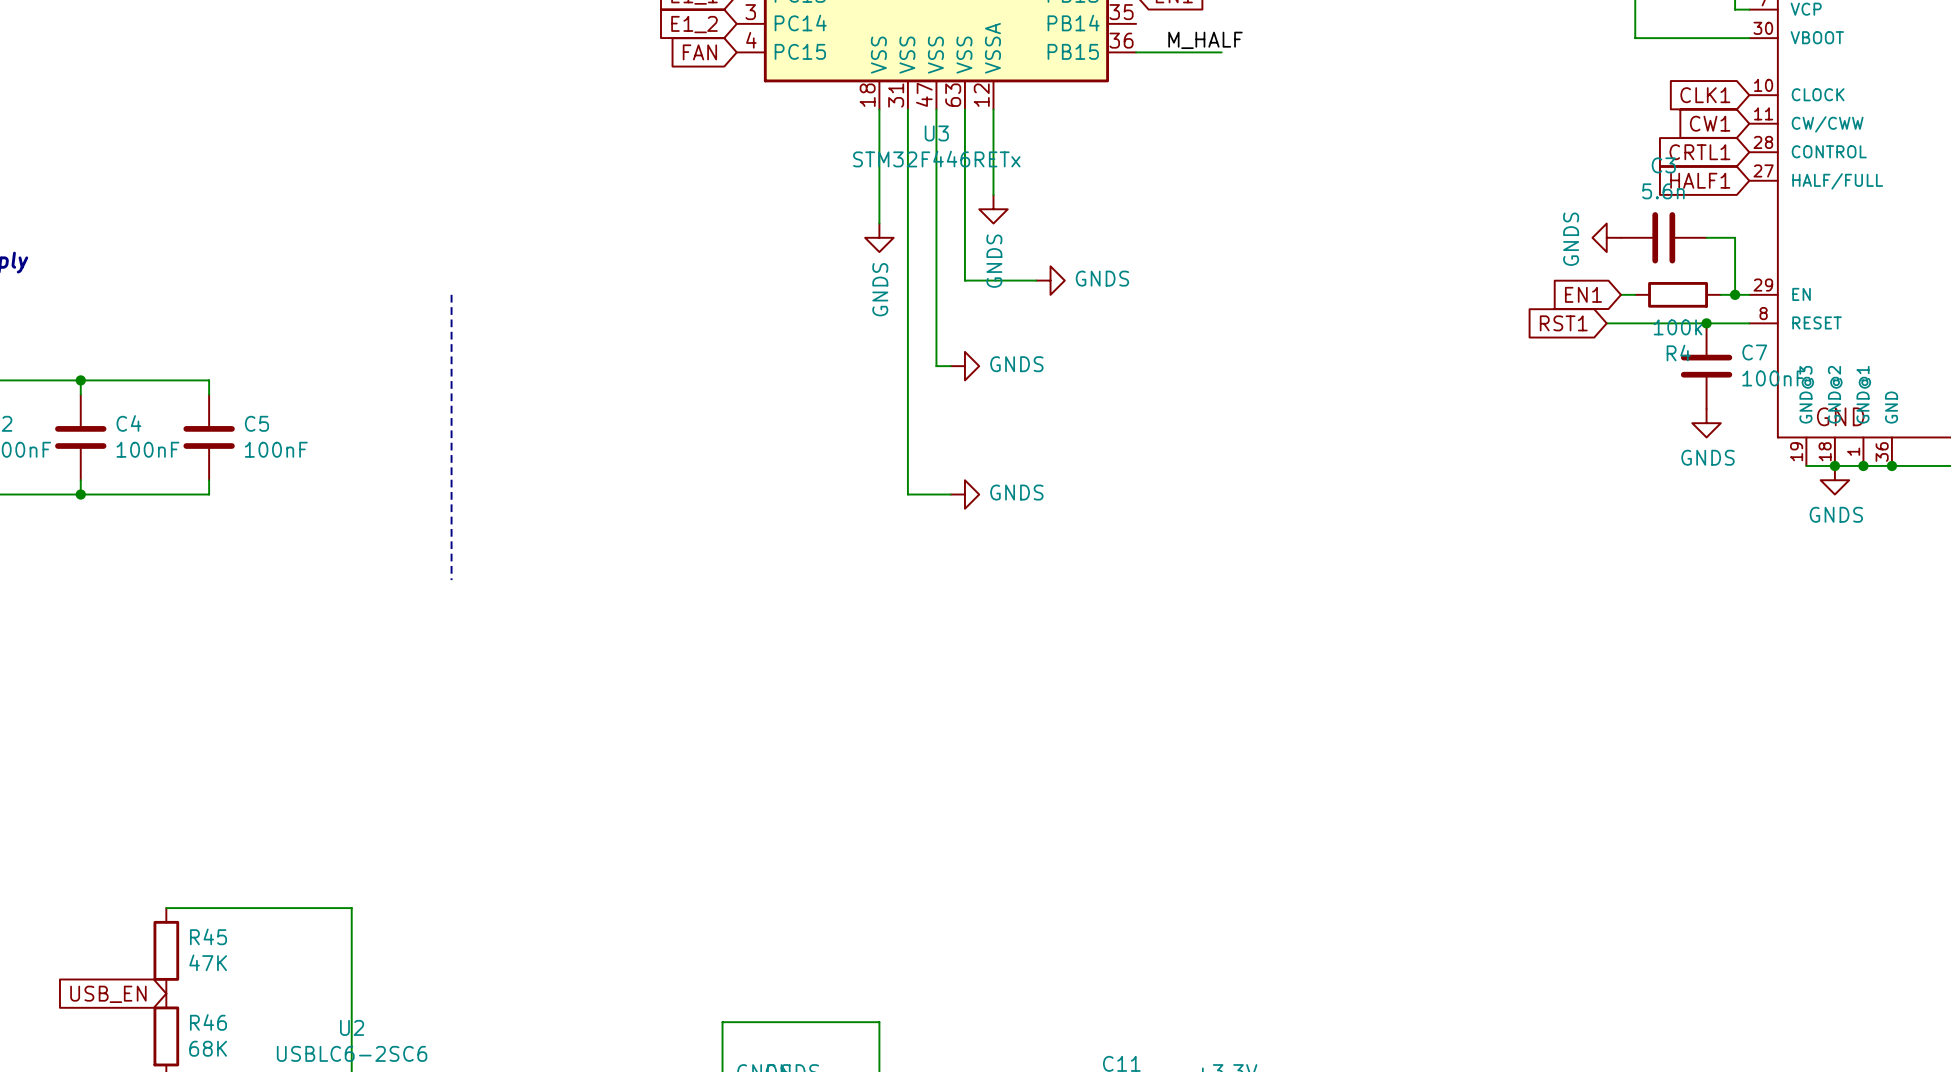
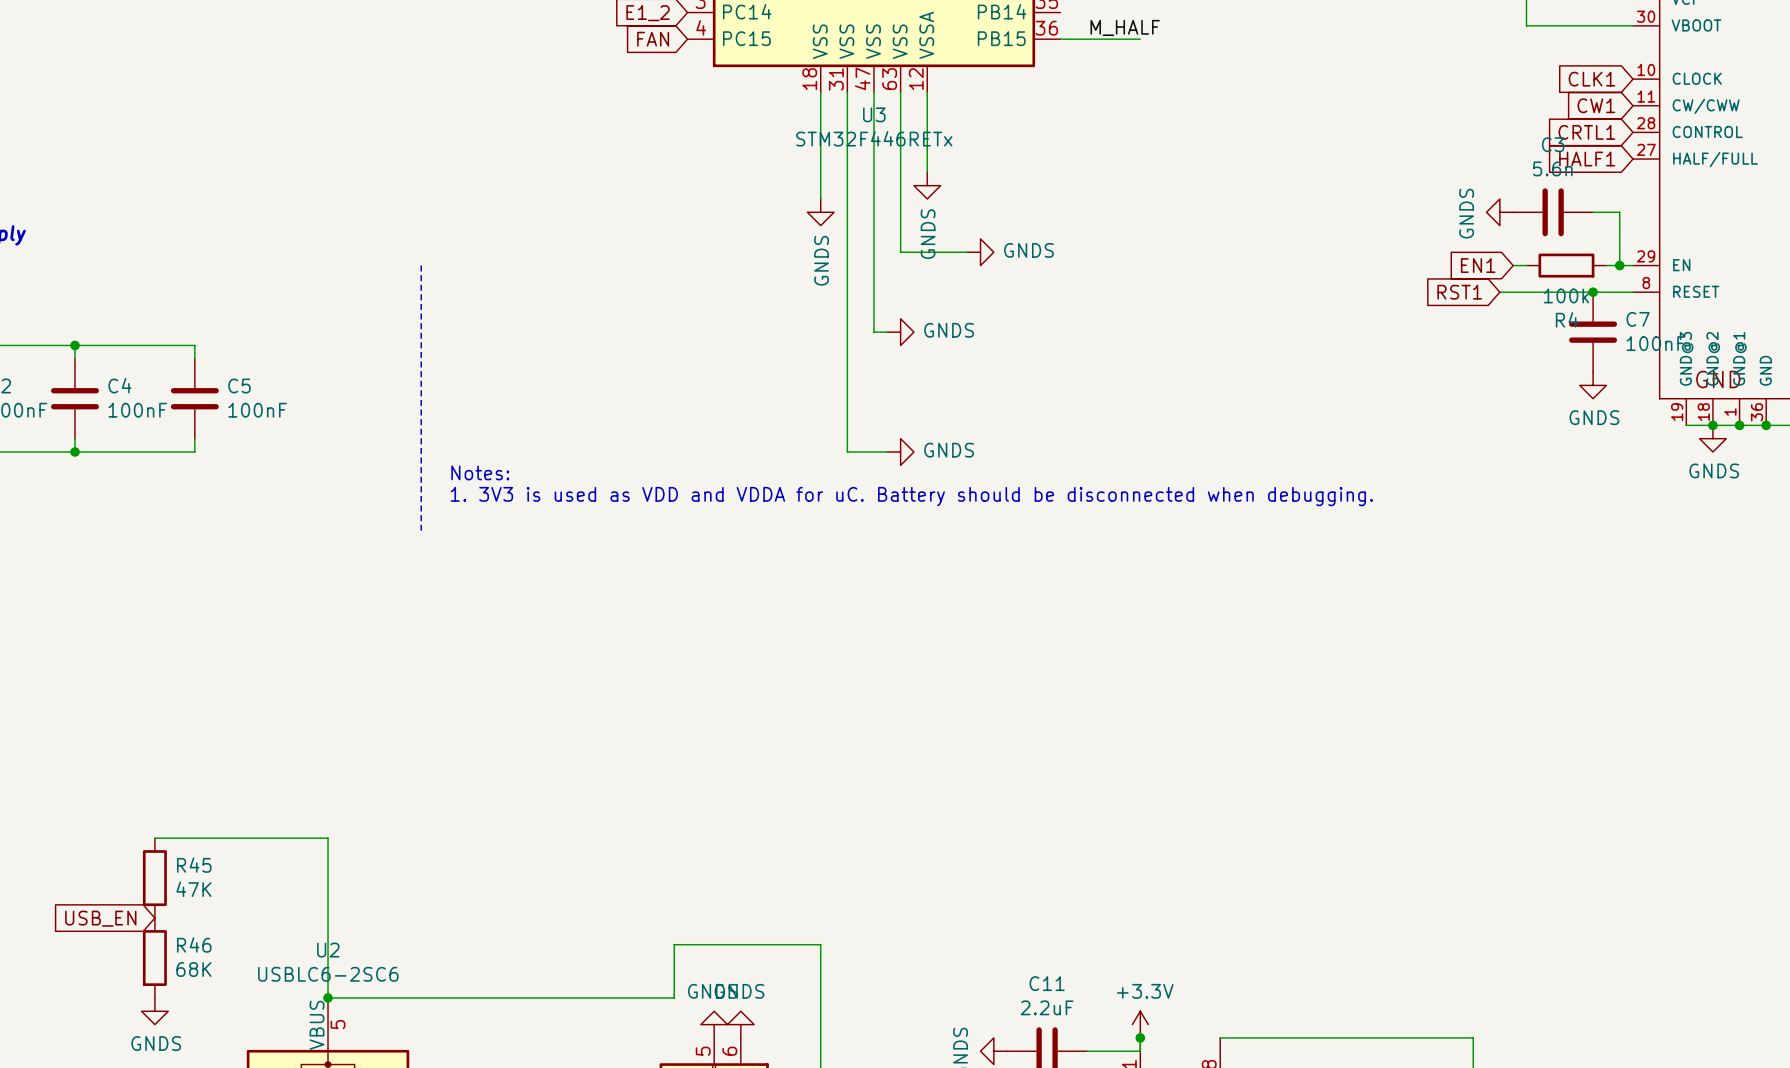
text: none -> Notes: (480, 472)
text: none -> 1. 3V3 is used as VDD and VDDA for uC. Battery should be disconnected when debugging. (911, 496)

